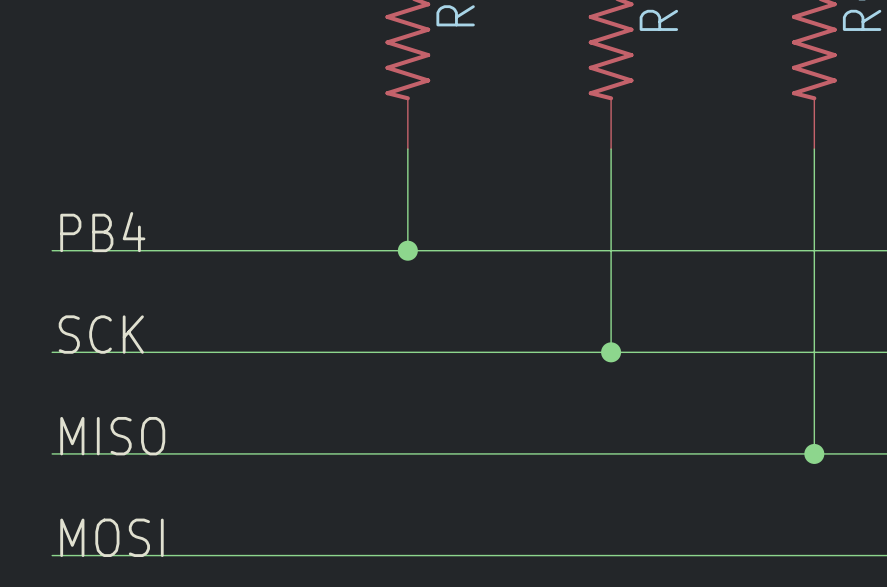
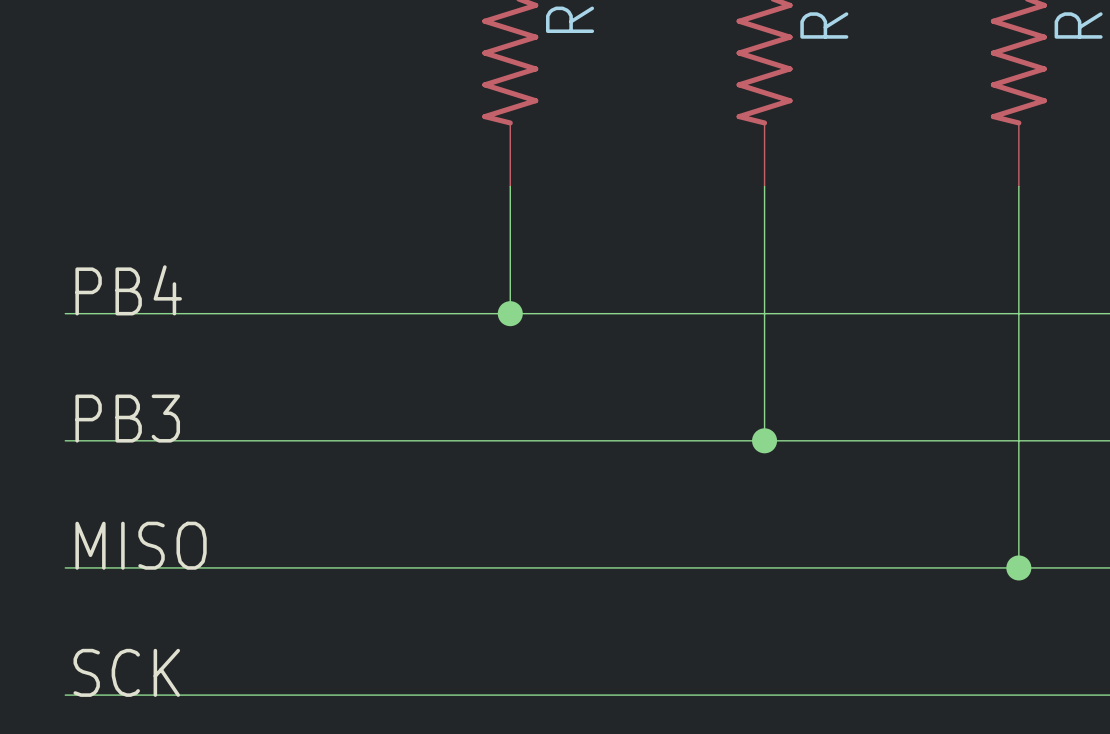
label: SCK (101, 334) -> PB3 (127, 418)
label: MOSI (111, 537) -> SCK (126, 672)

